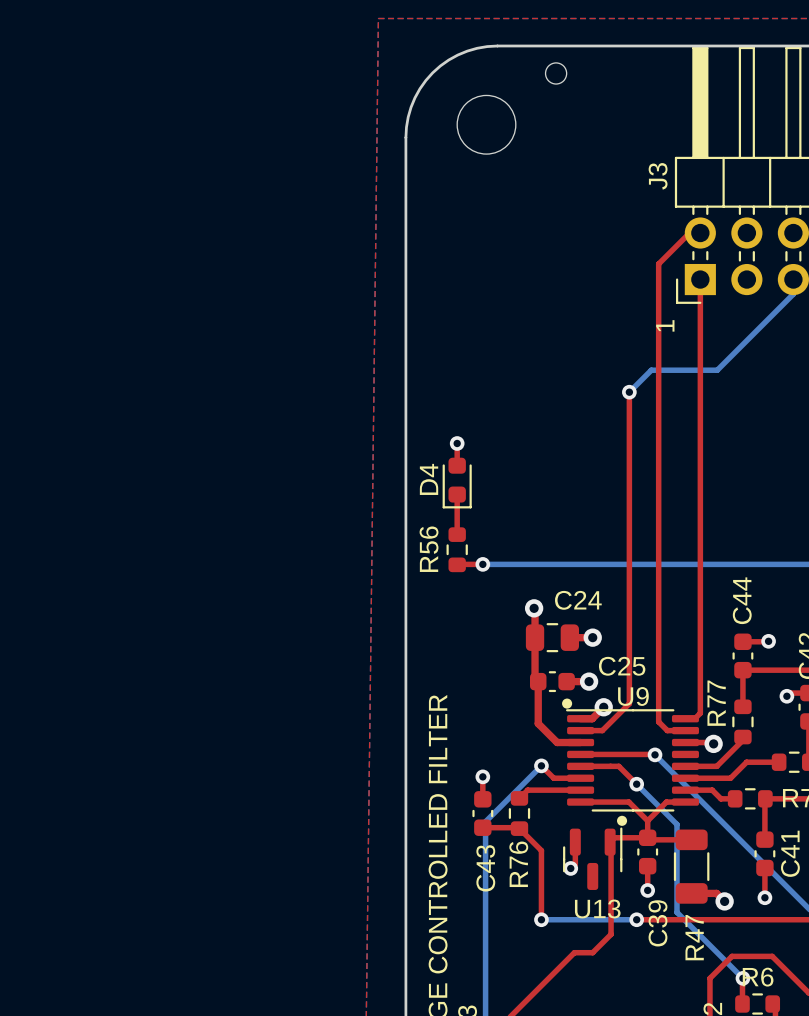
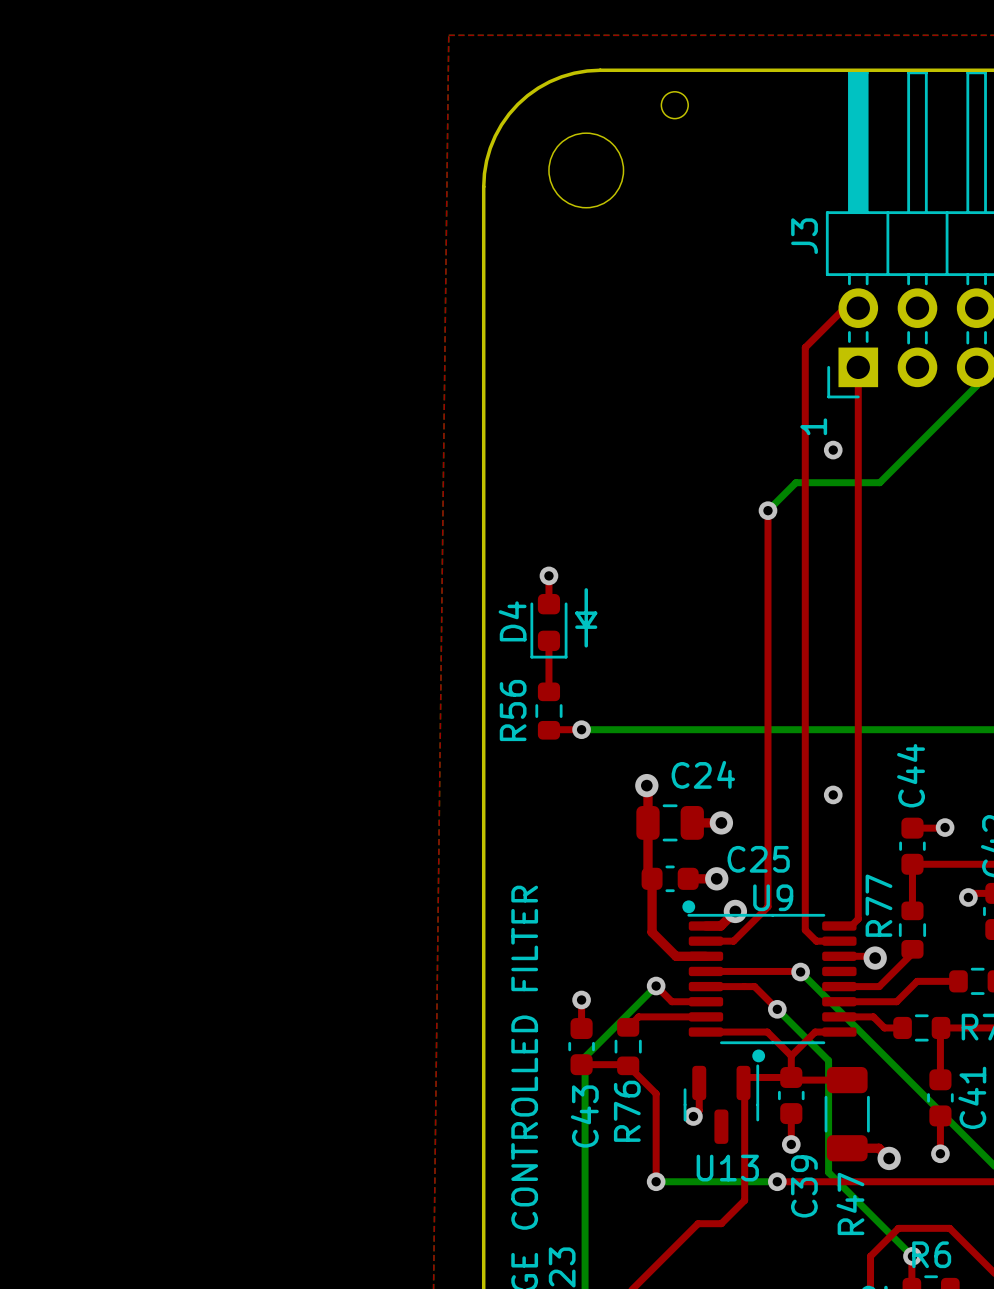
via: none -> (833, 450)
line: none -> (586, 589) (586, 645)
line: none -> (576, 613) (586, 627) (595, 613) (576, 613)
line: none -> (576, 627) (595, 627)
via: none -> (833, 794)

